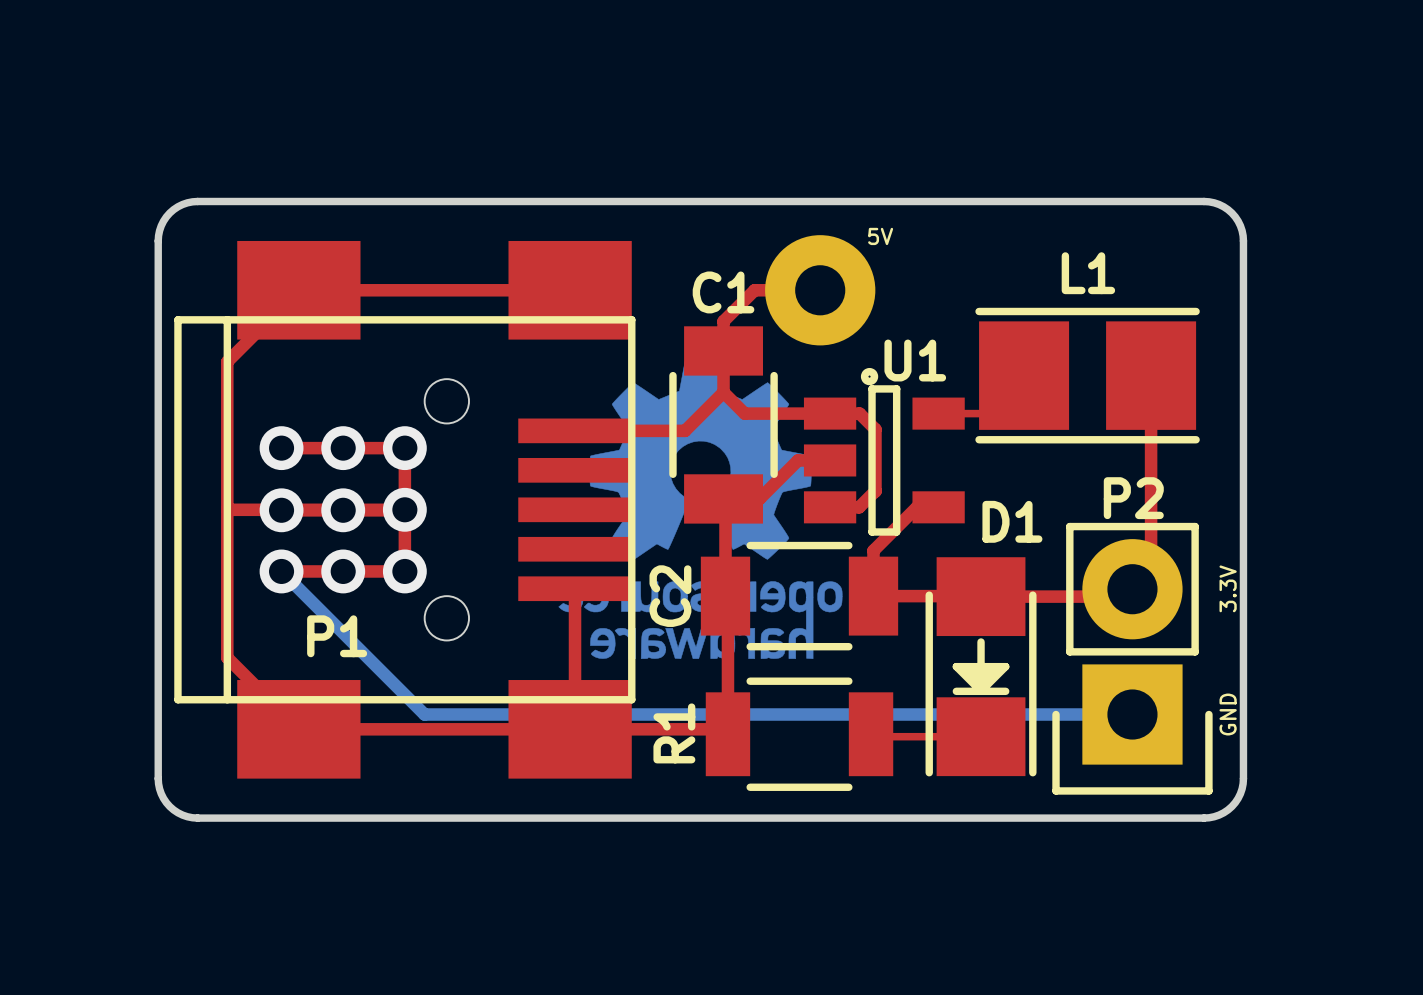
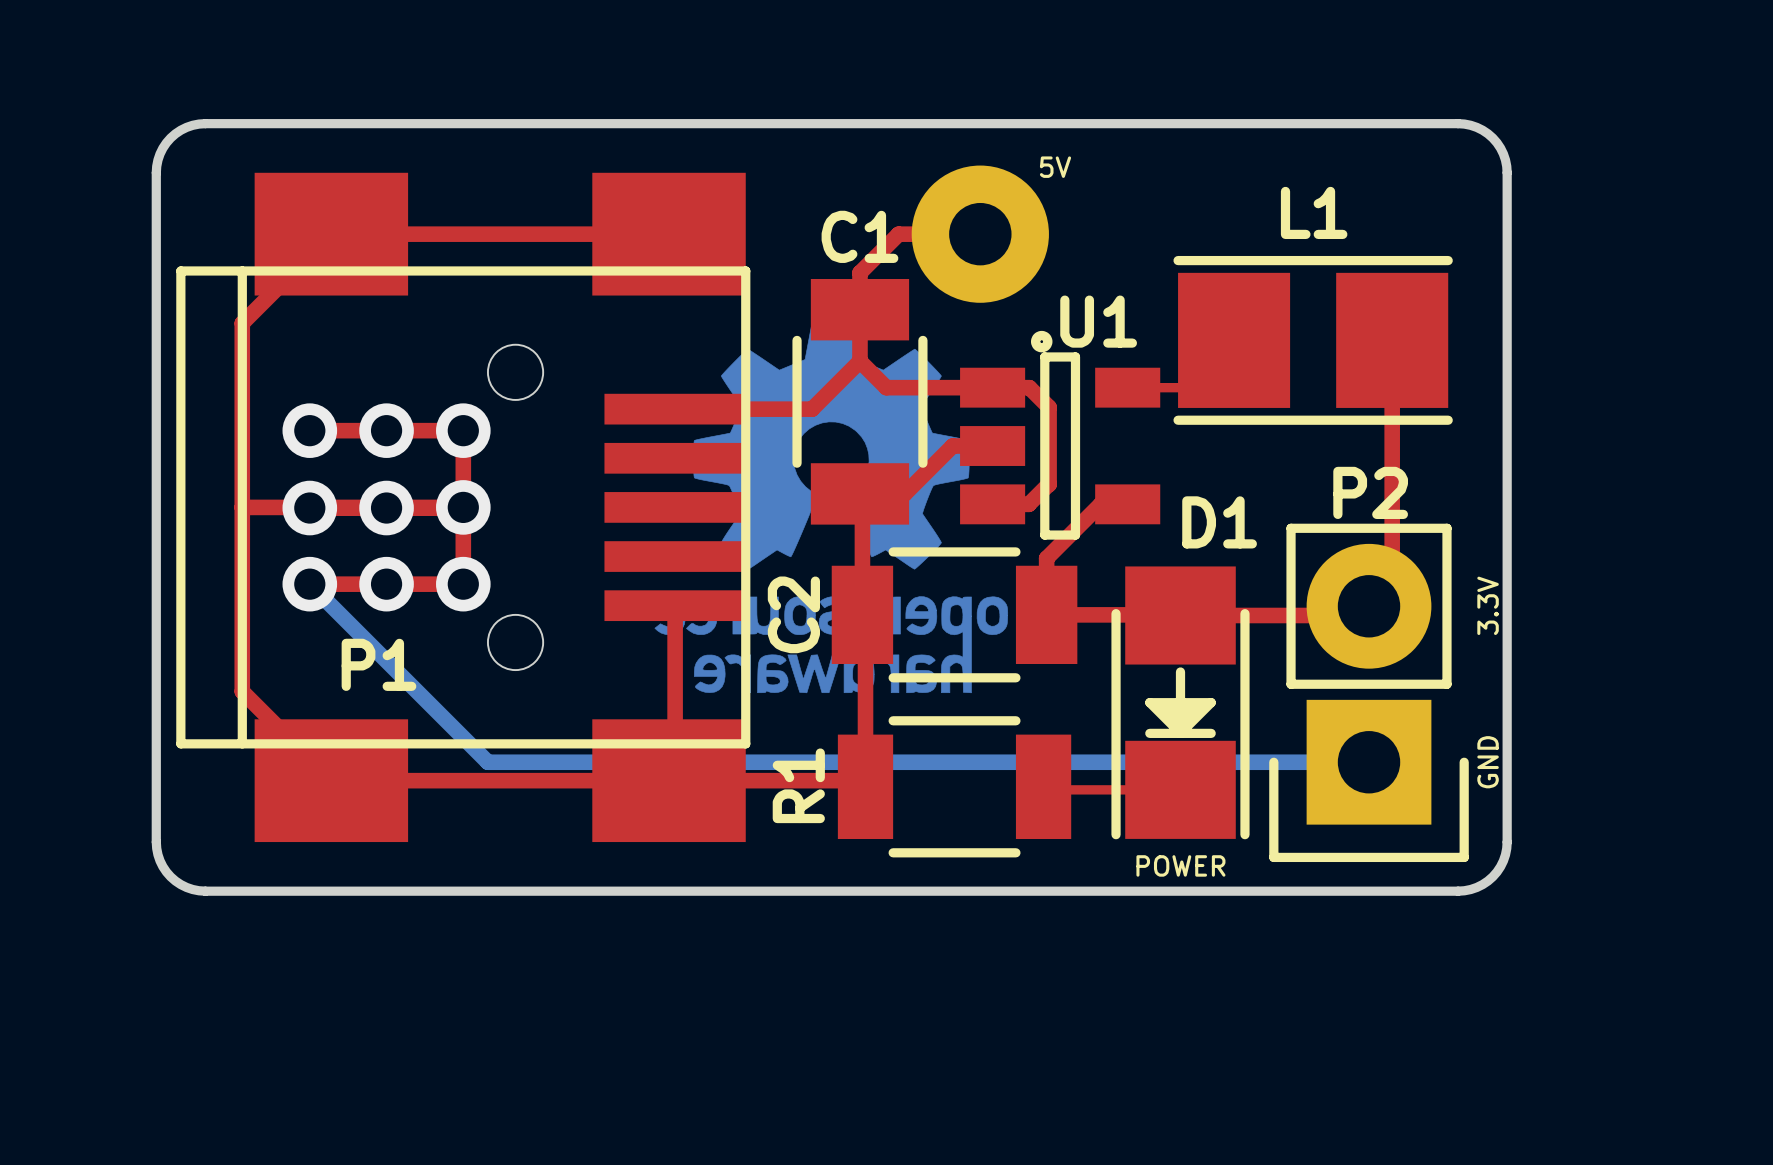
text: none -> POWER (1180, 865)

